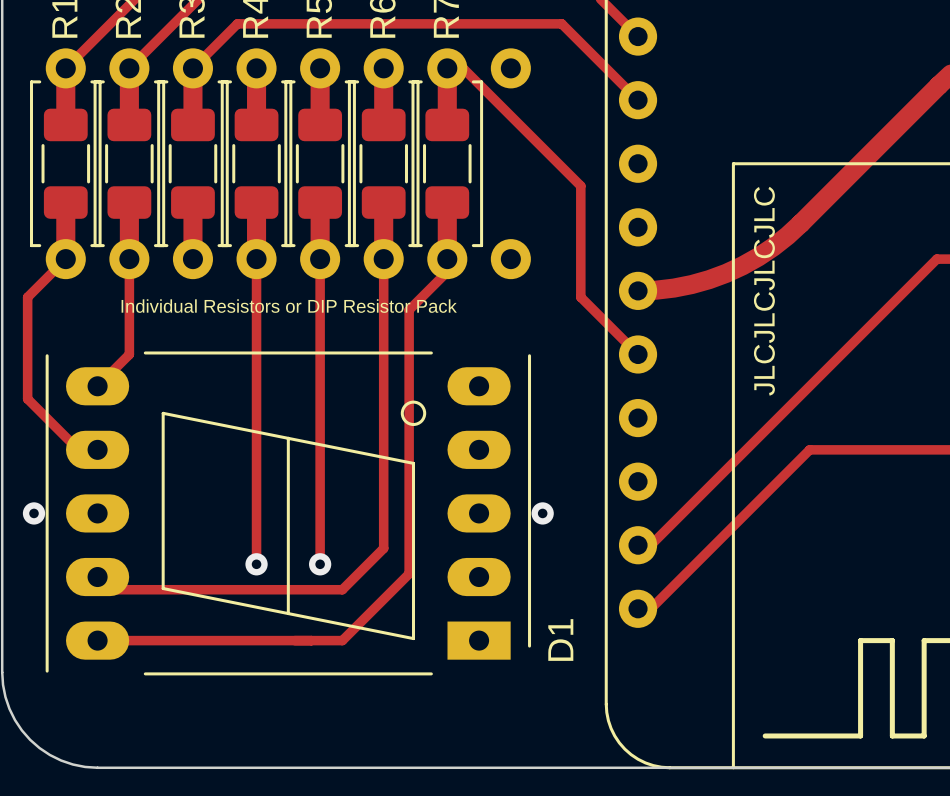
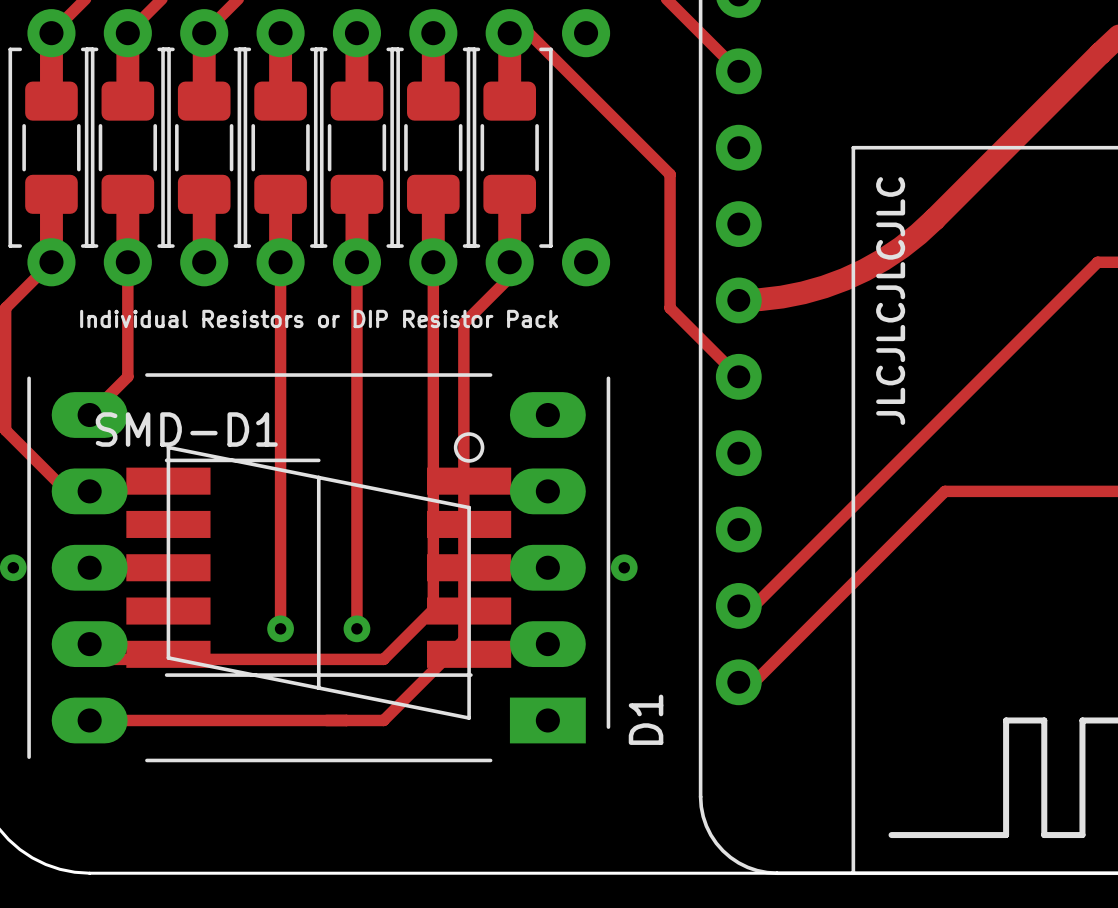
SMD-D1: none -> (318, 567)

